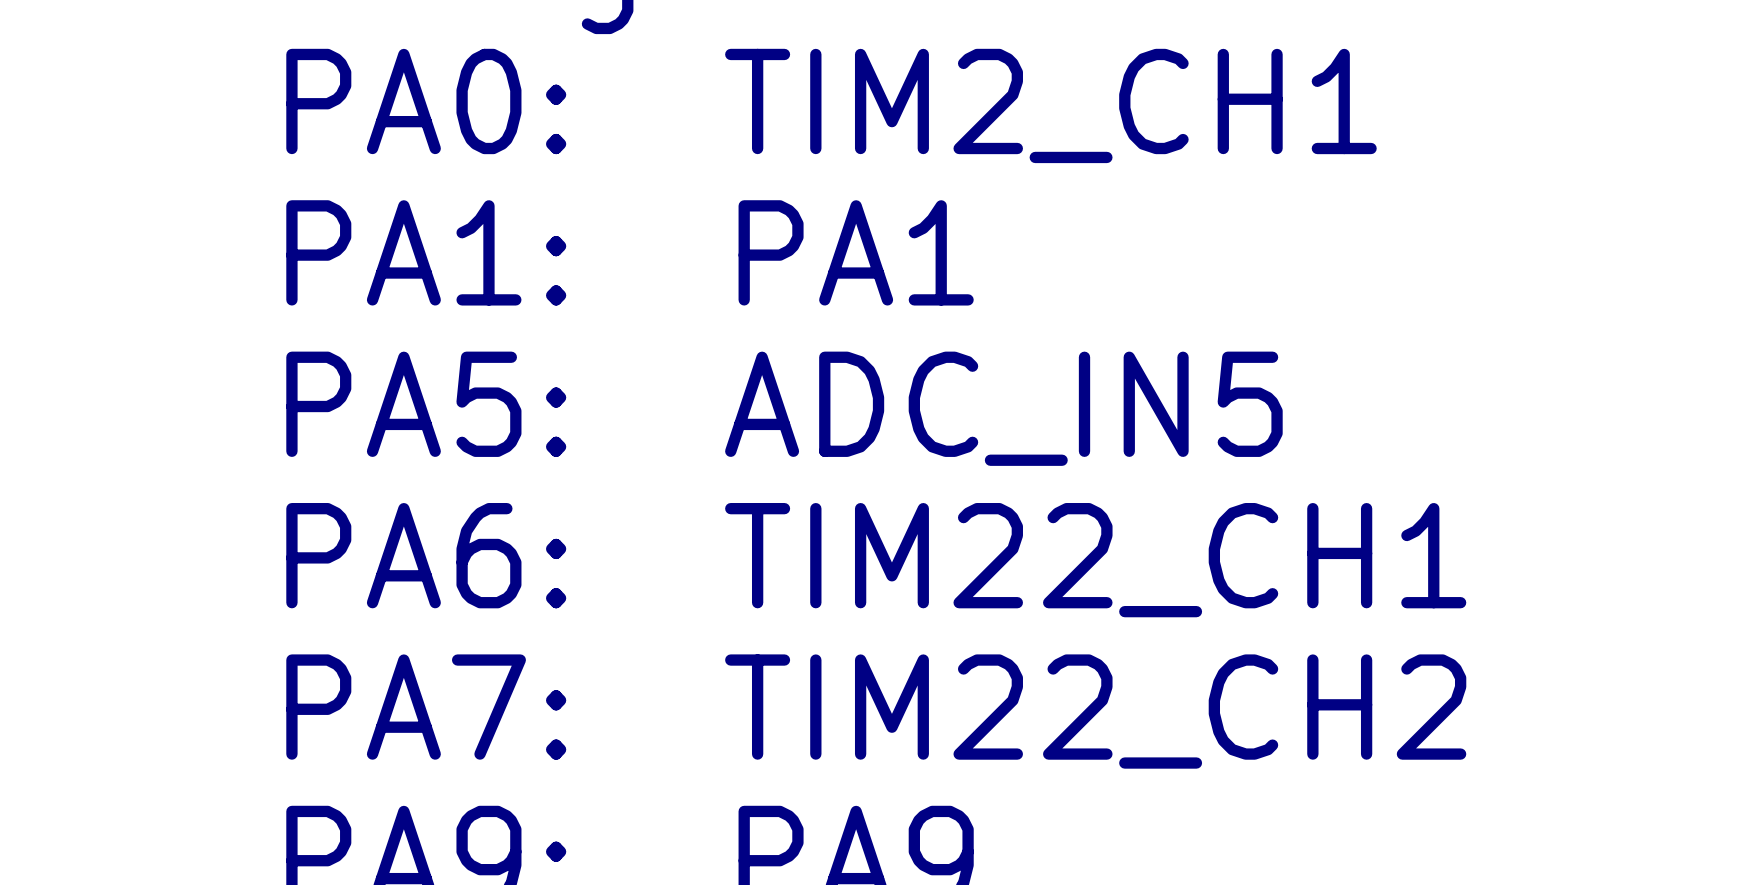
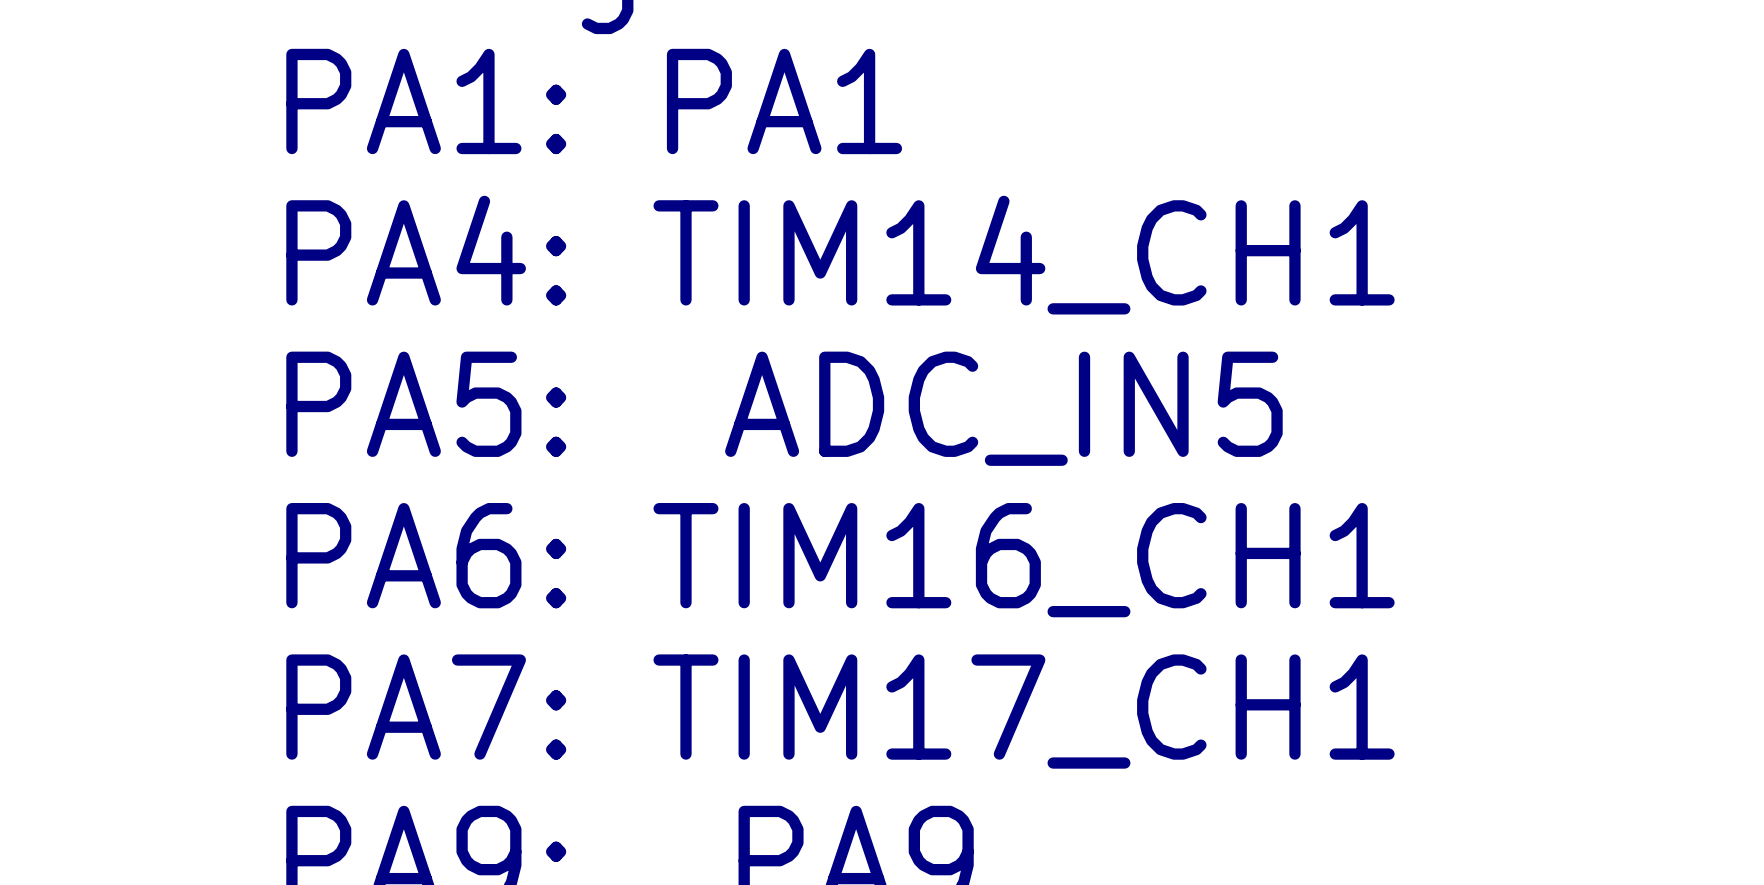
text: PA0: TIM2_CH1 (831, 105) -> PA1: PA1 (594, 101)
text: PA1: PA1 (630, 252) -> PA4: TIM14_CH1 (840, 255)
text: PA6: TIM22_CH1 (876, 560) -> PA6: TIM16_CH1 (840, 560)
text: PA7: TIM22_CH2 (876, 711) -> PA7: TIM17_CH1 (840, 711)

